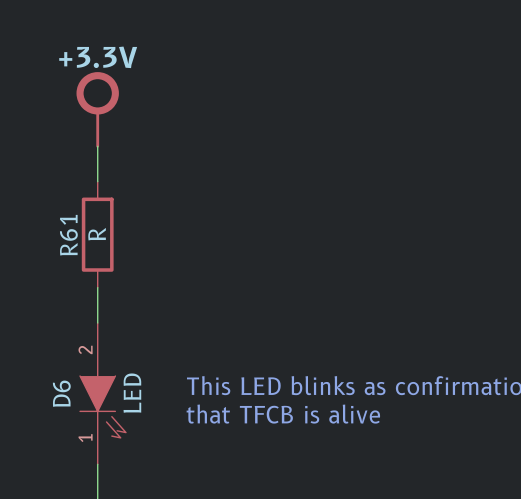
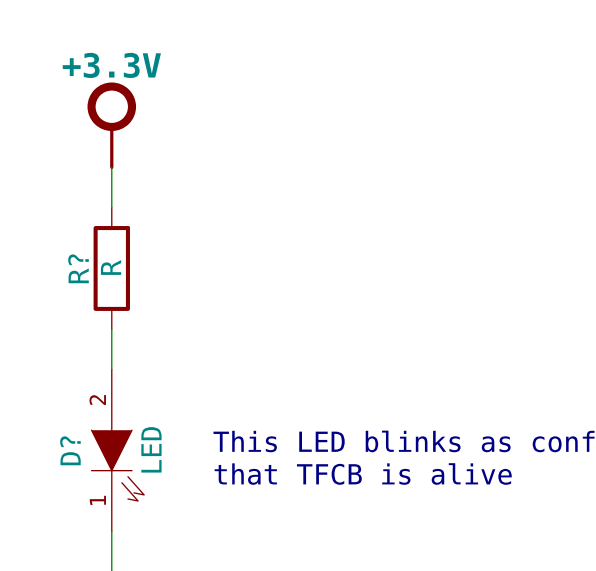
R61 name: R61 (68, 235) -> R? (78, 268)
D6 name: D6 (61, 393) -> D? (70, 450)

